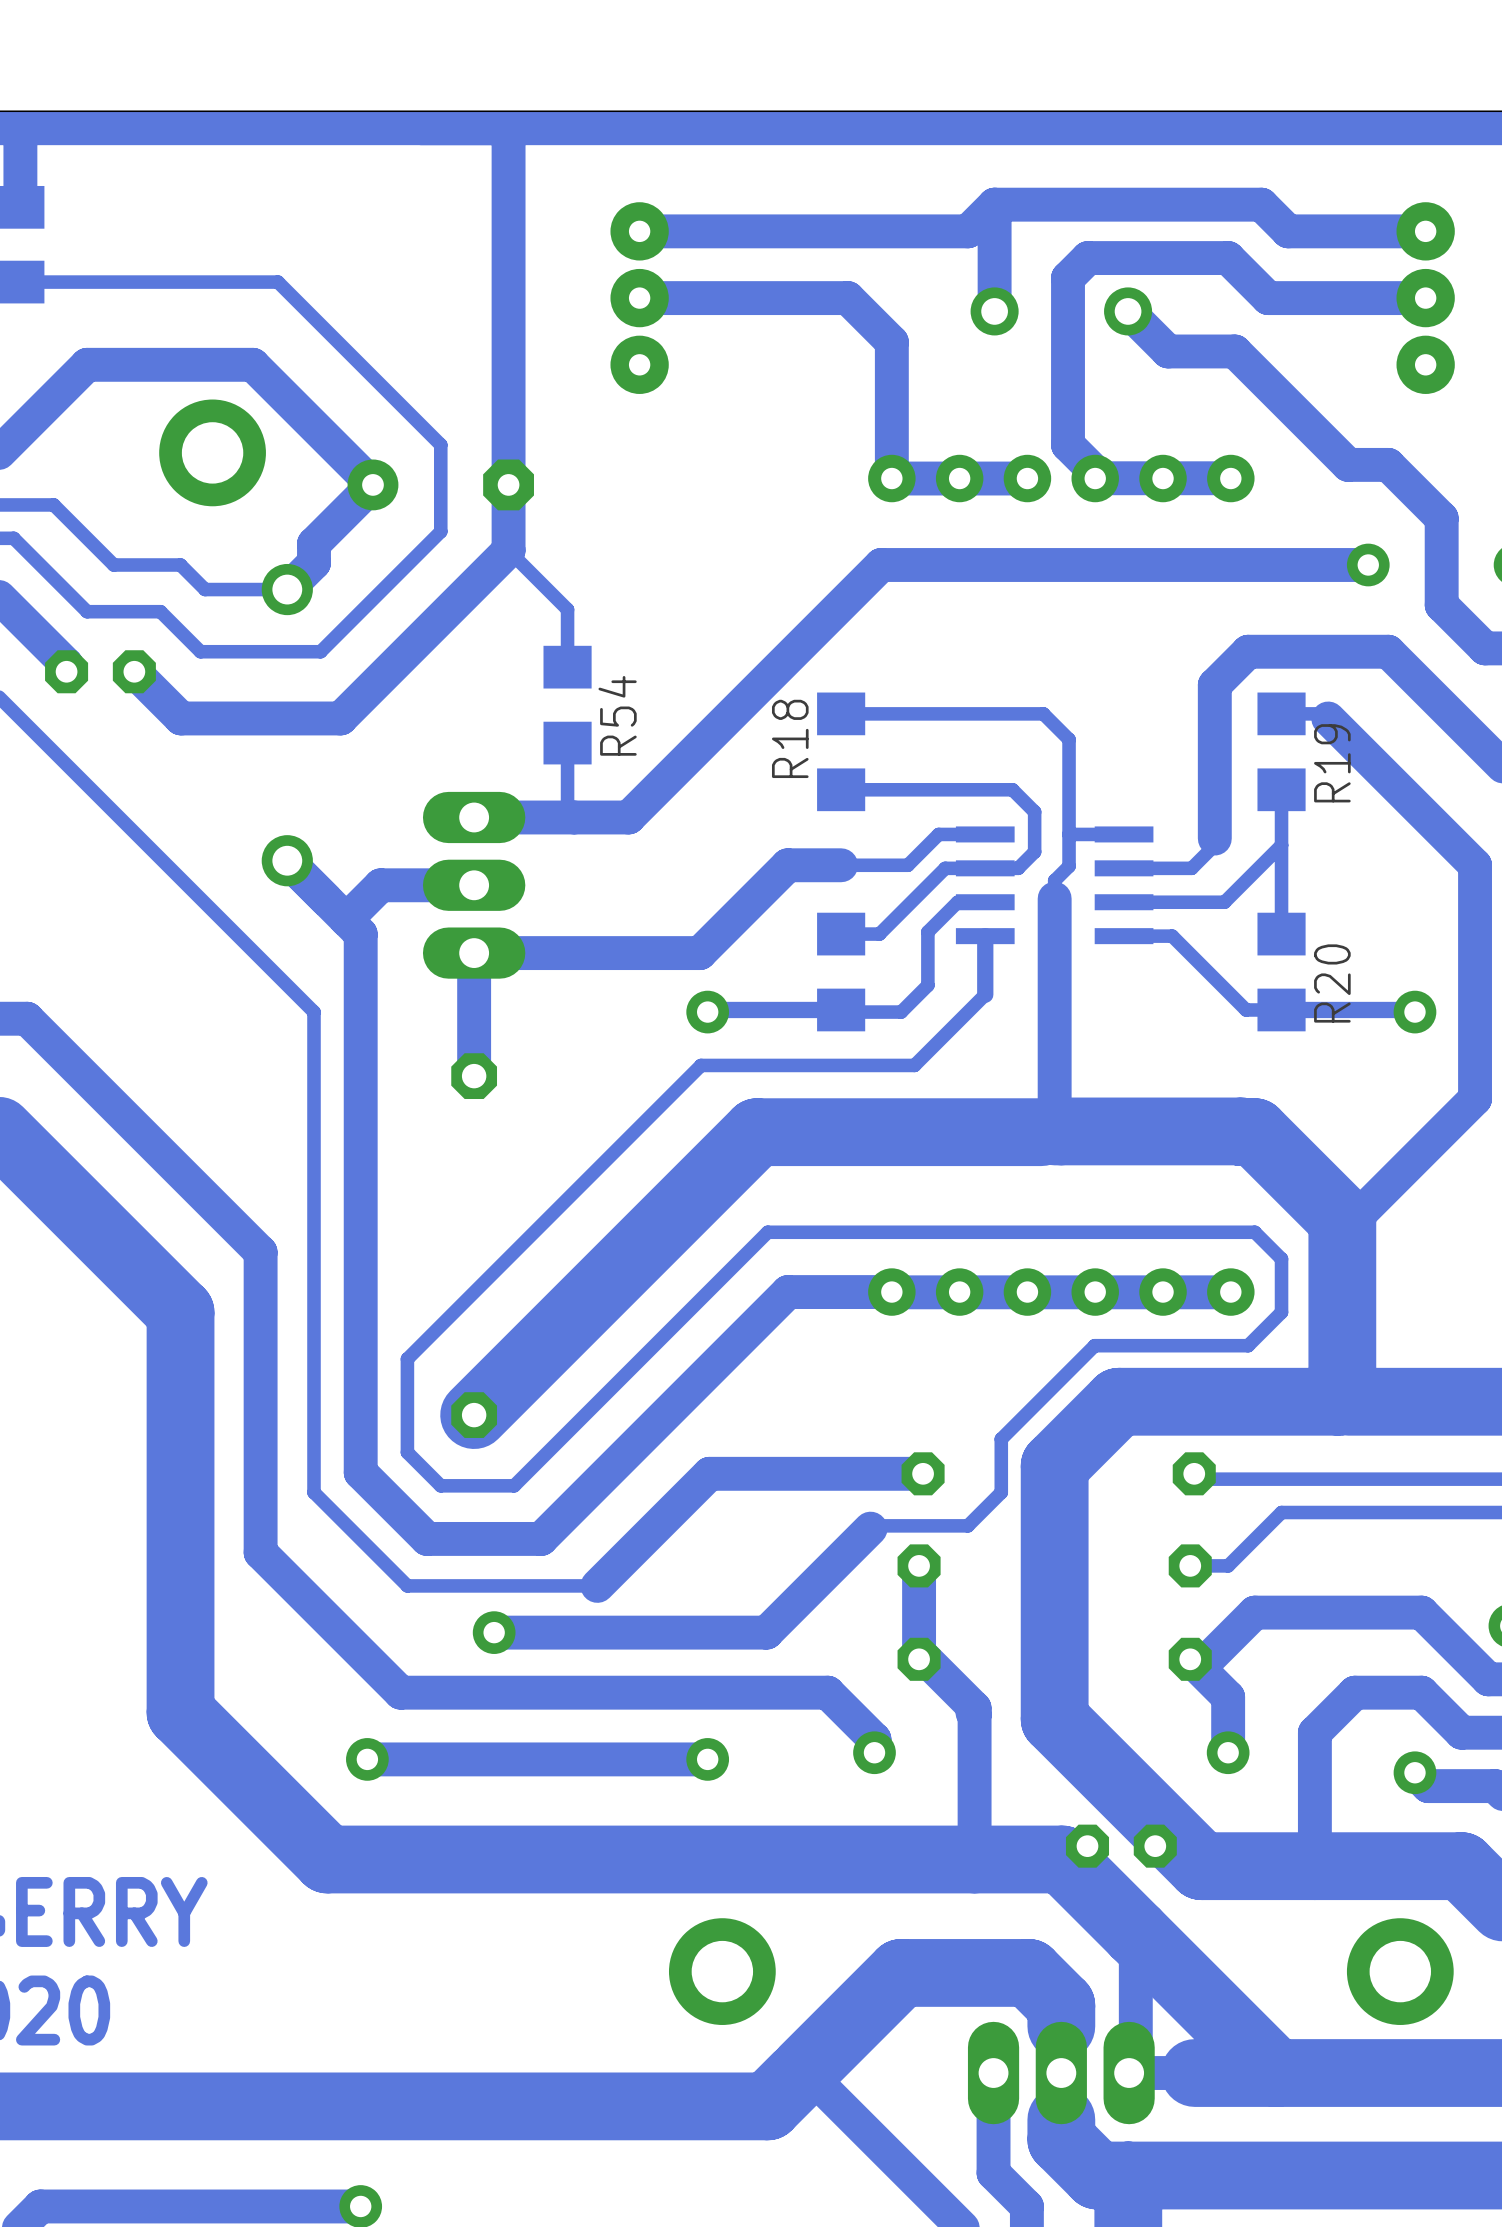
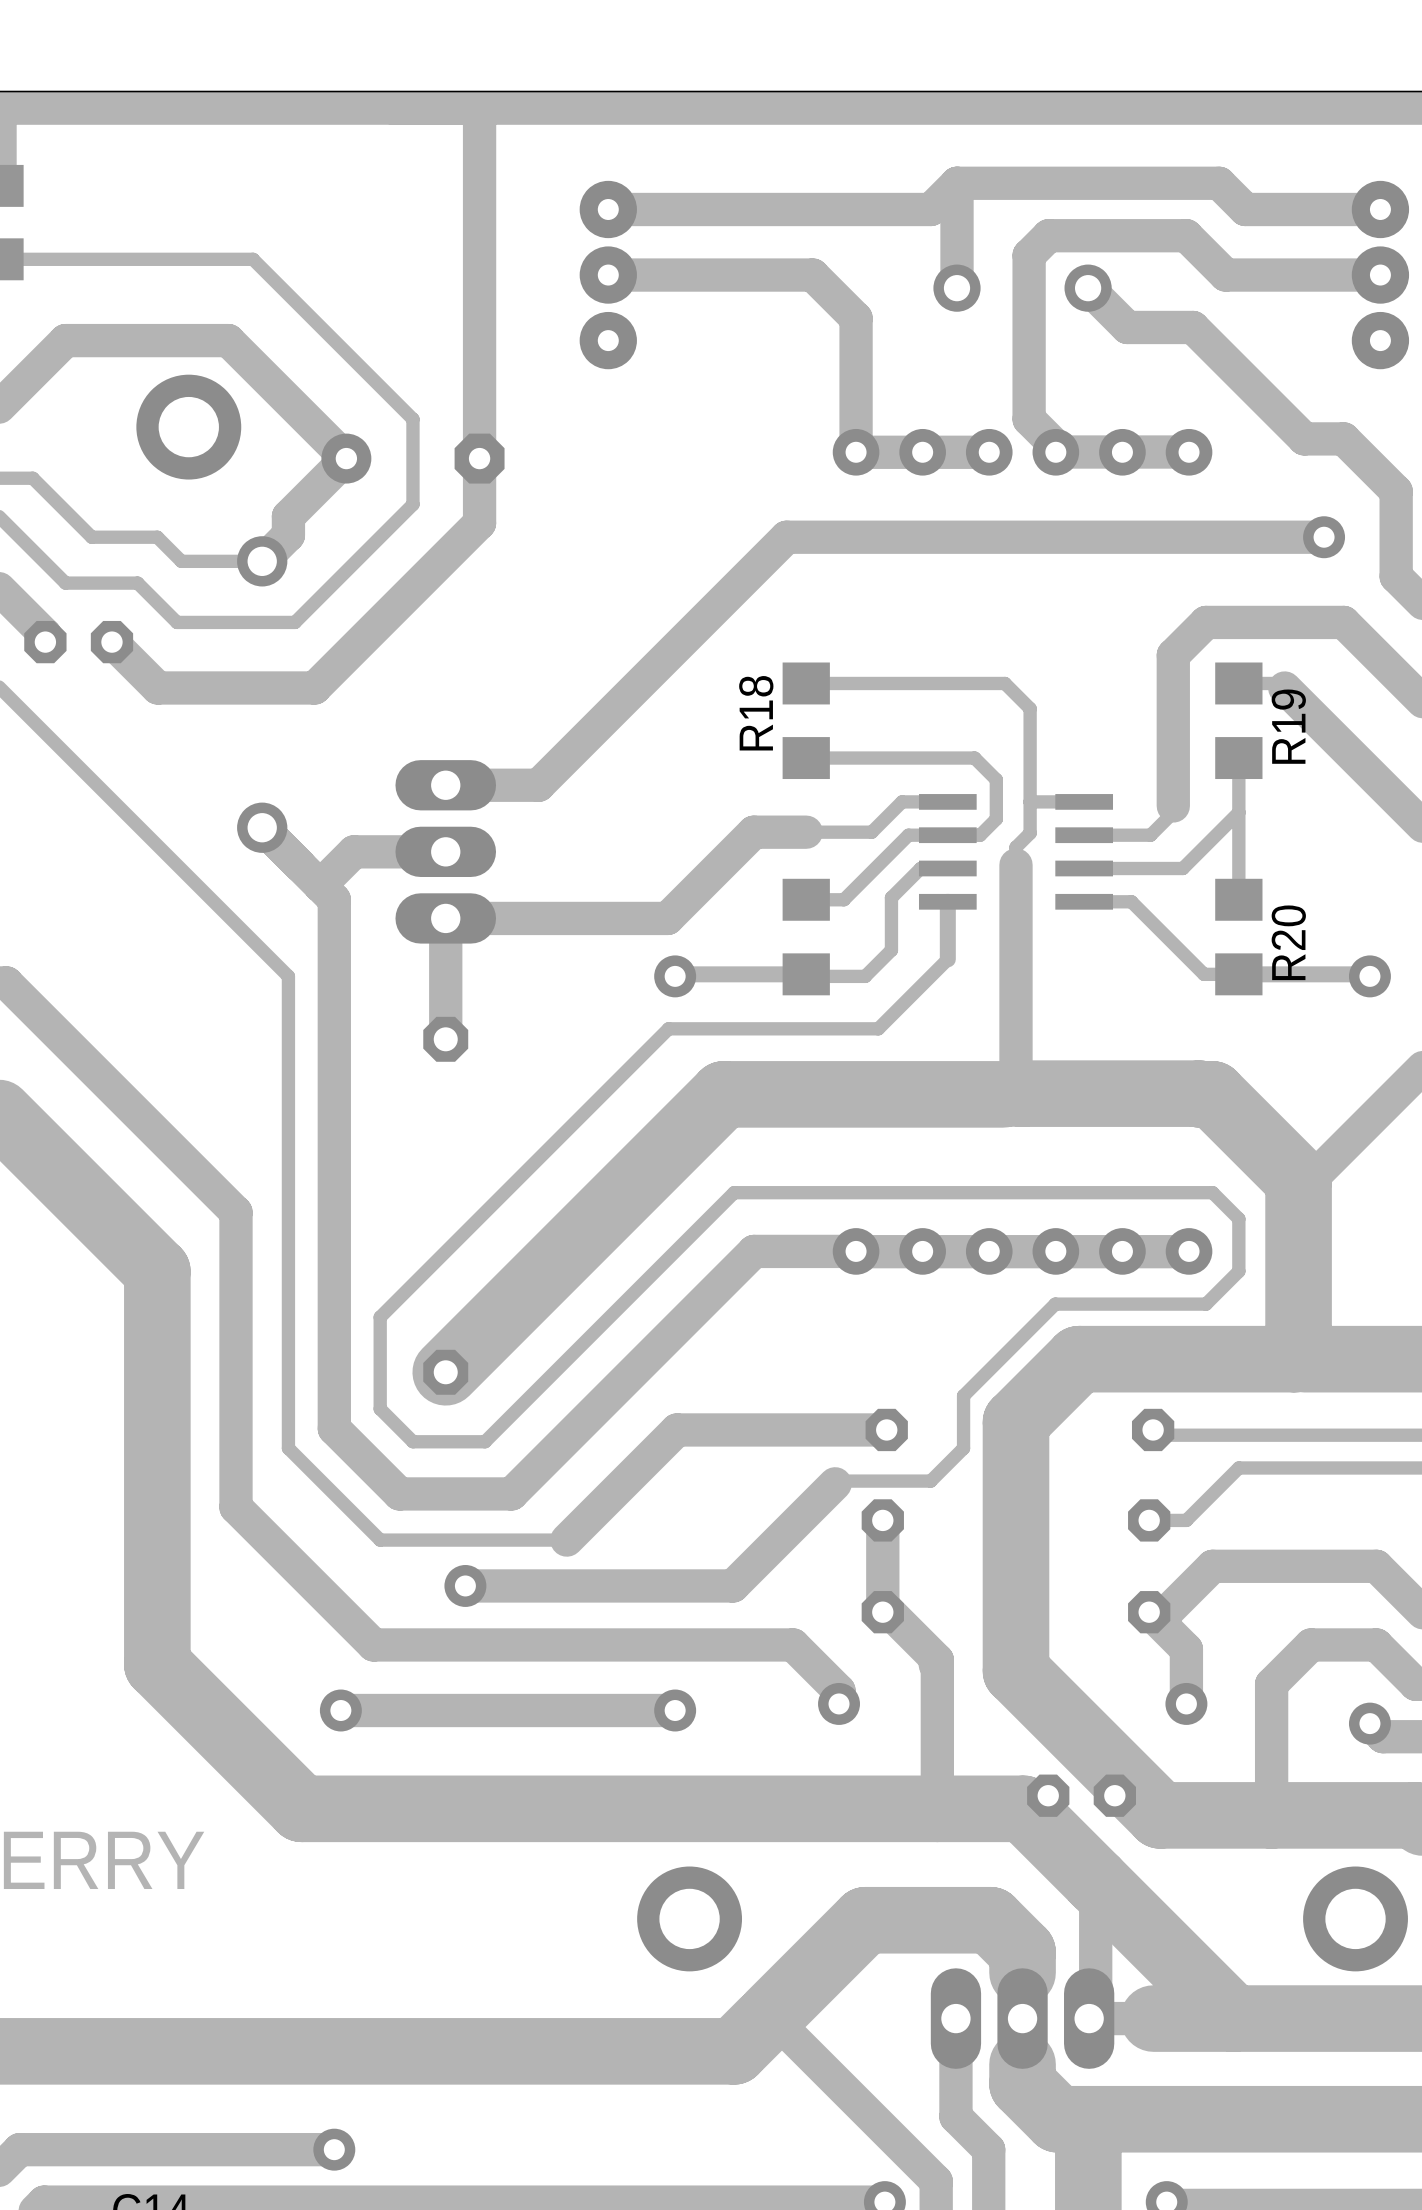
track: (508, 550) (567, 609) (567, 667) -> none
track: (881, 565) (628, 817) (568, 817) -> (845, 537) (786, 537) (538, 785)
R54: (567, 705) -> none
track: (567, 743) (567, 810) (574, 817) -> none

